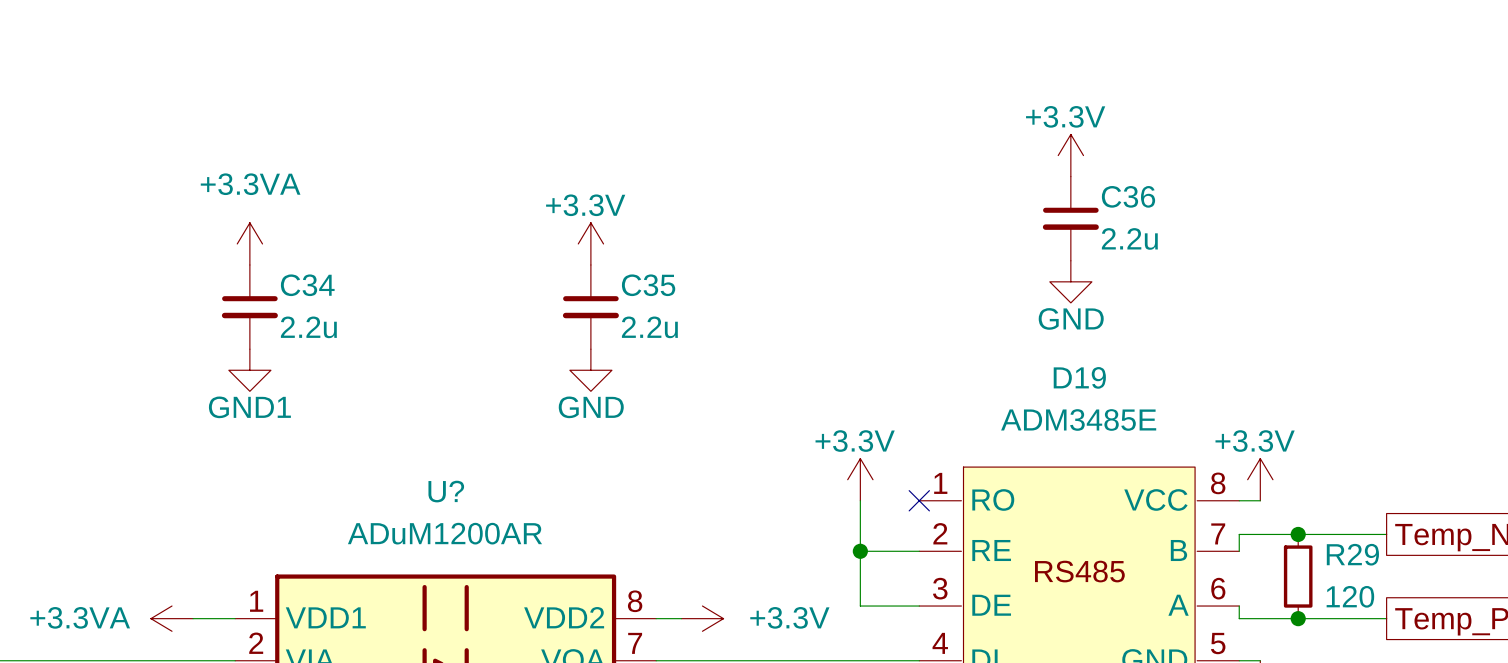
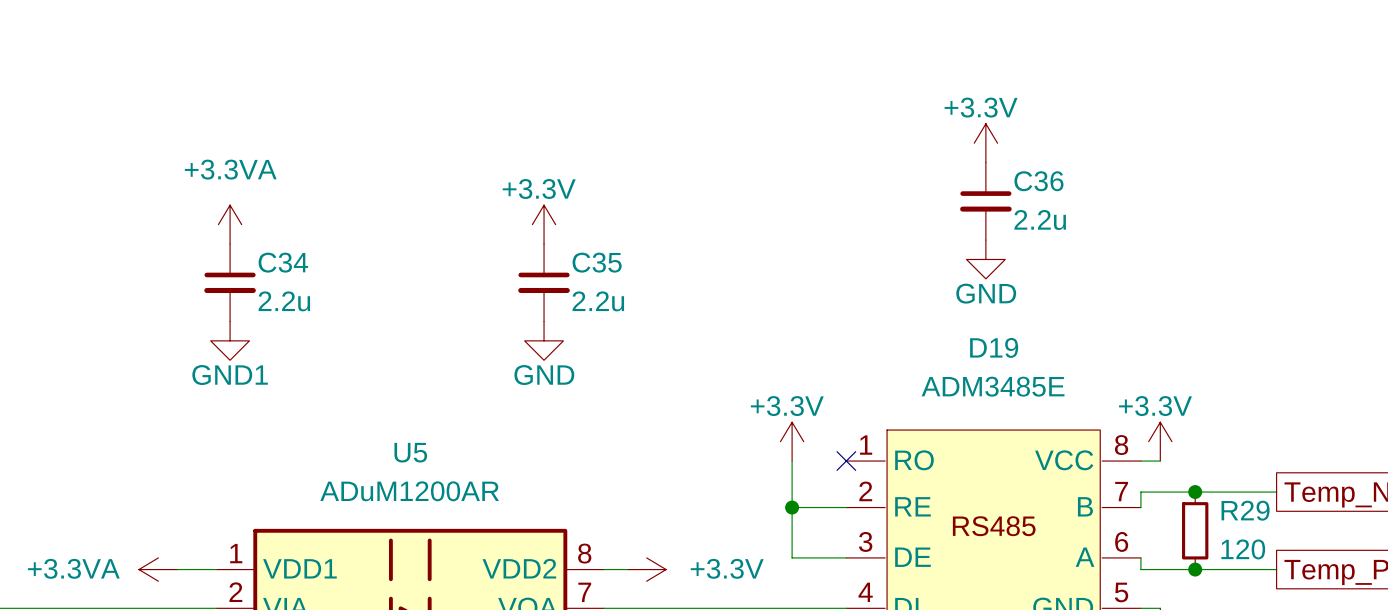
U? name: U? (446, 491) -> U5 (410, 452)

